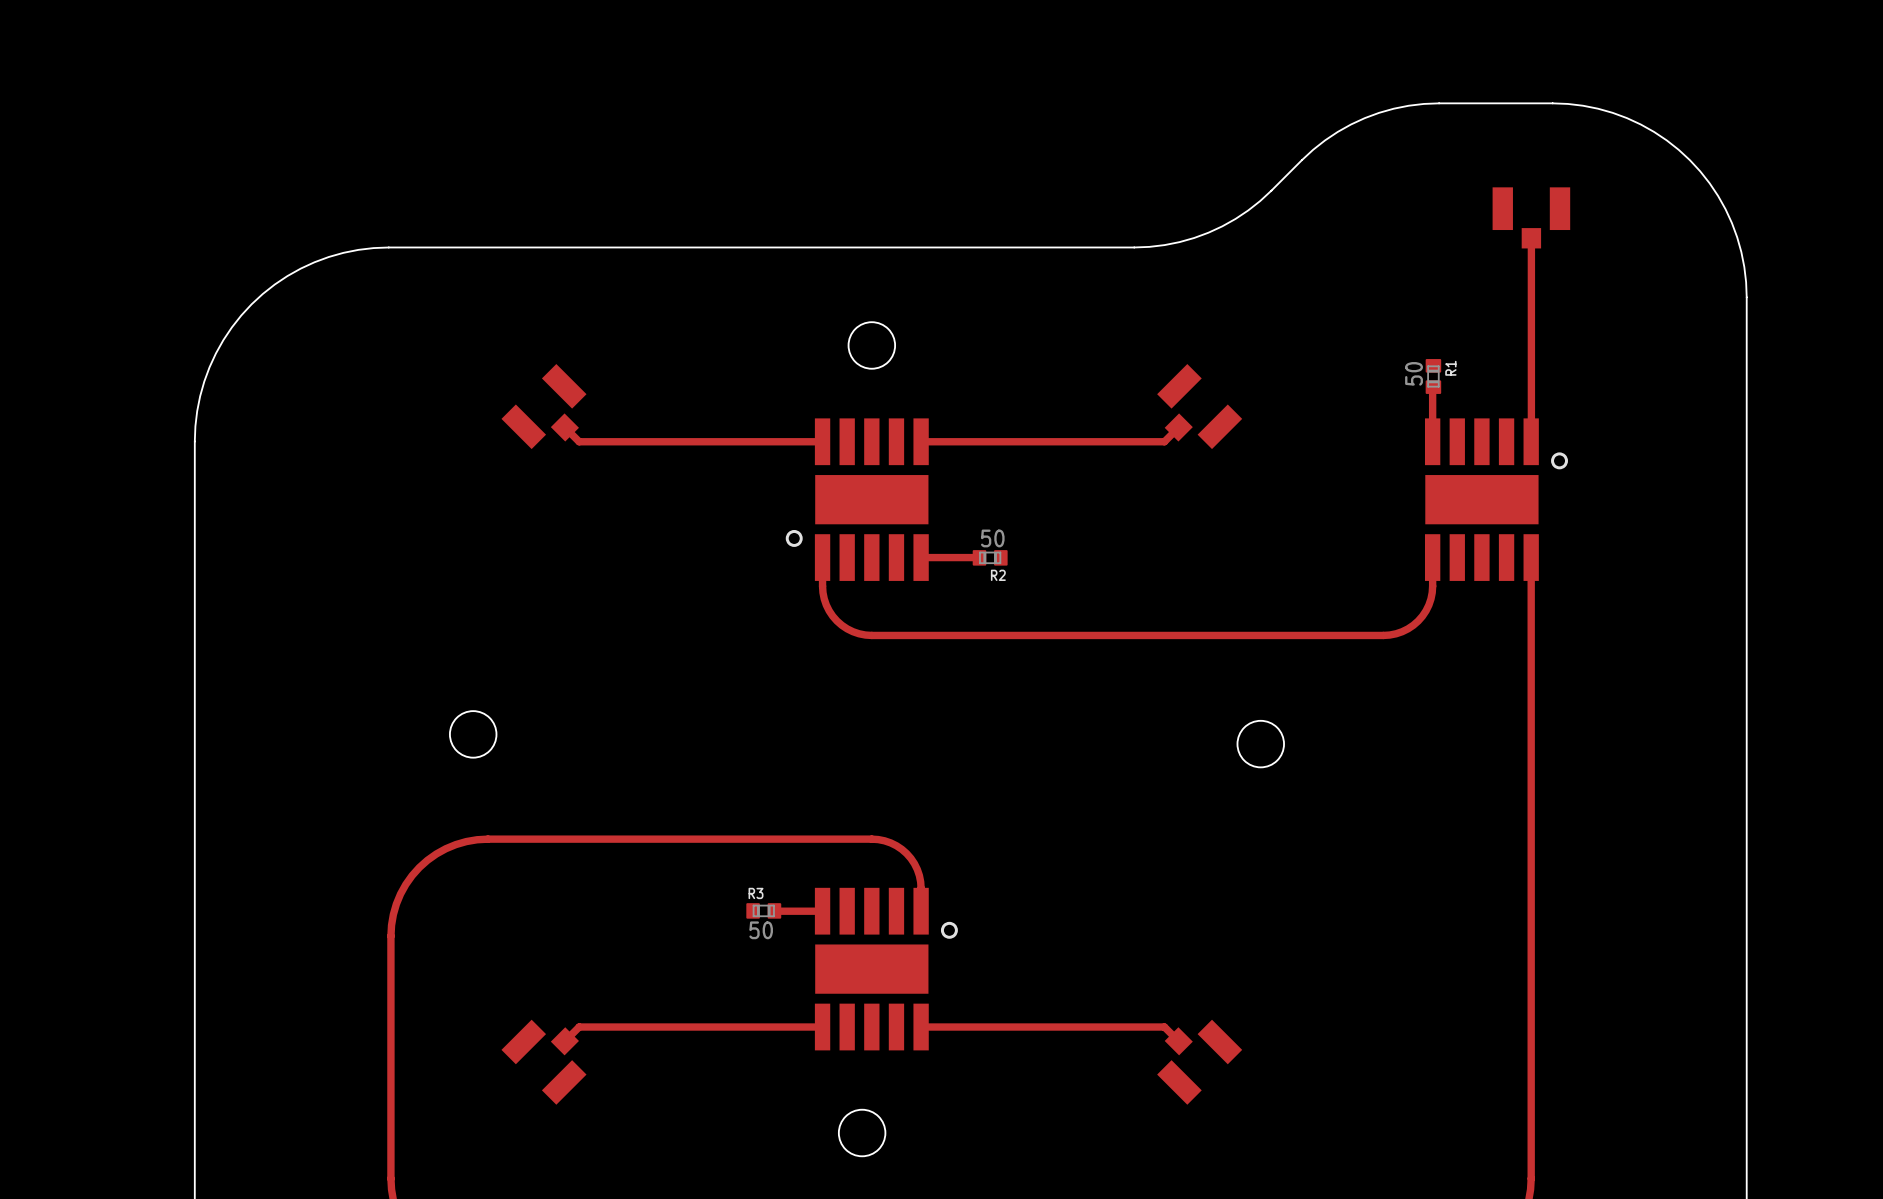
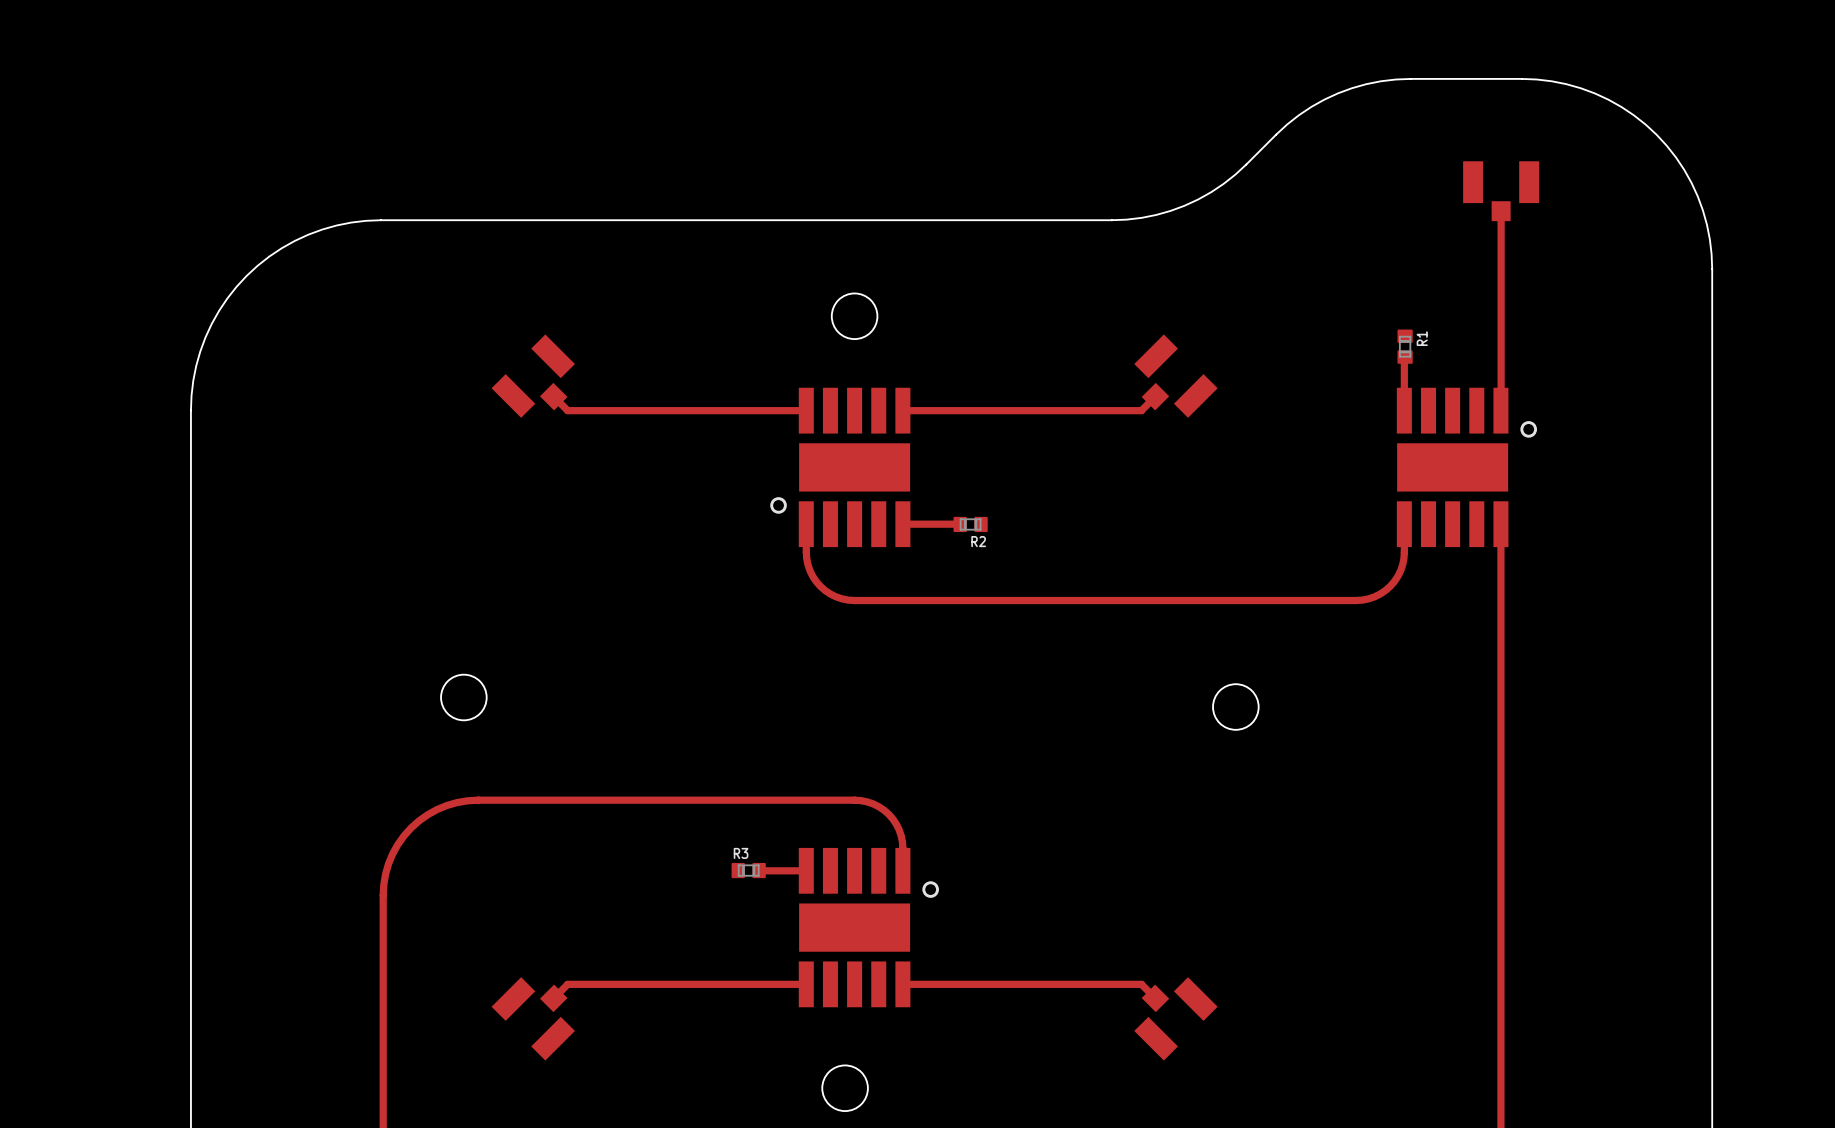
R1 value: 50 (1414, 373) -> none
R2 value: 50 (992, 538) -> none
R3 value: 50 (761, 930) -> none

